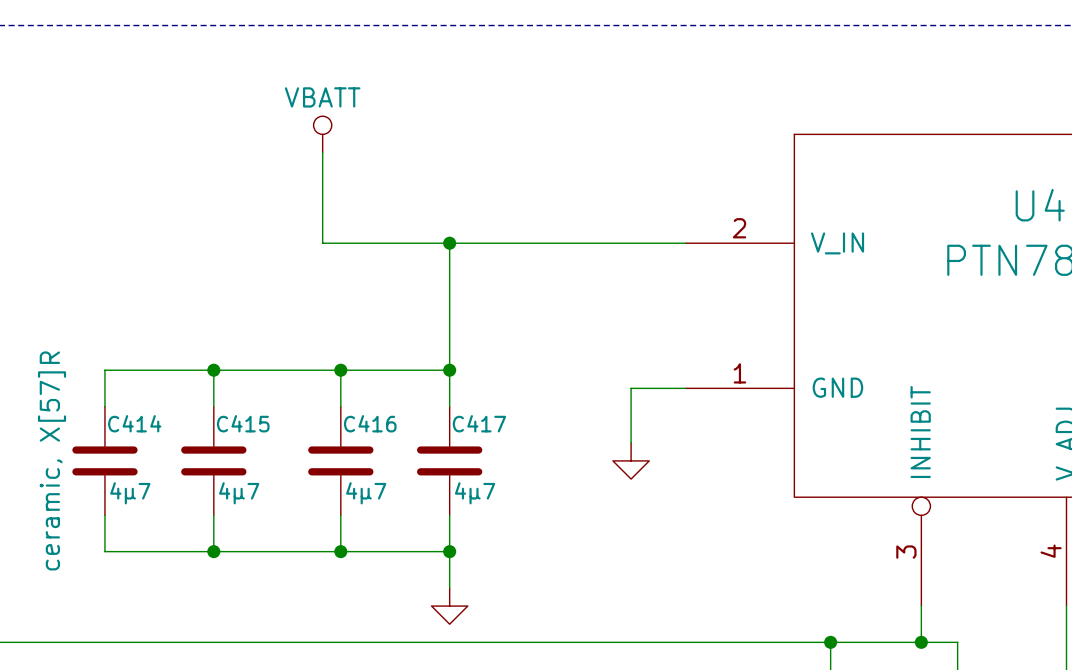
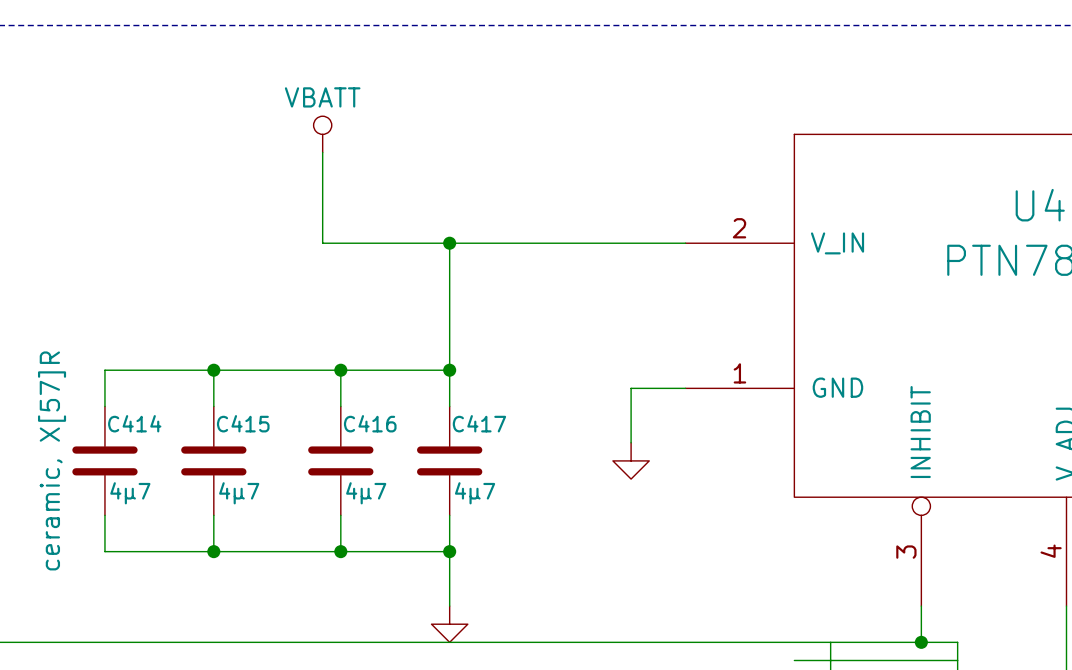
power symbol position: (449, 606) -> (449, 624)
junction: (830, 642) -> none
wire: none -> (794, 660) (957, 660)

